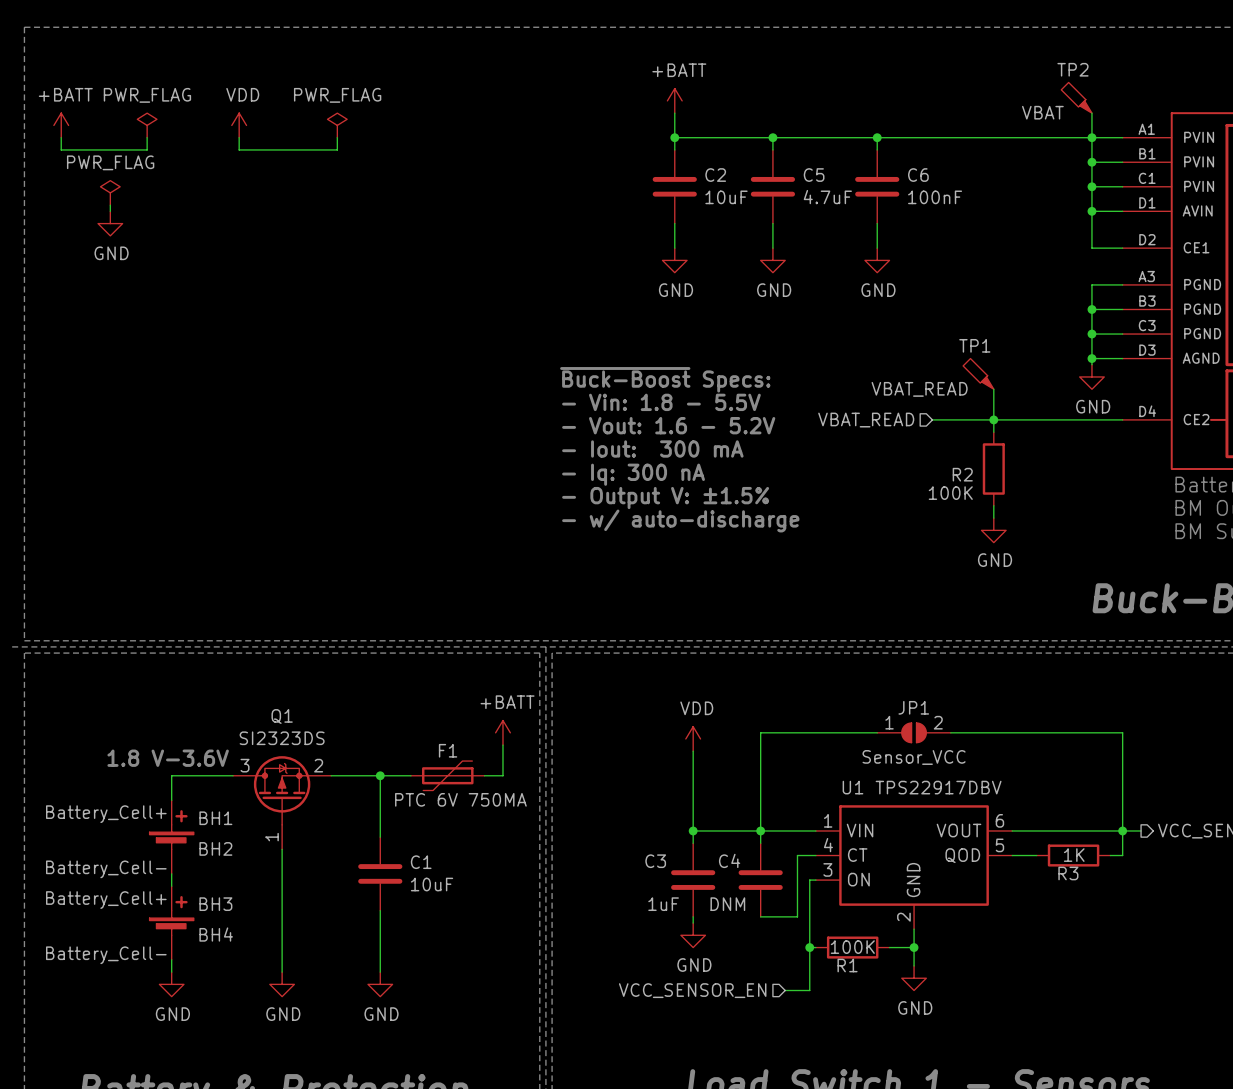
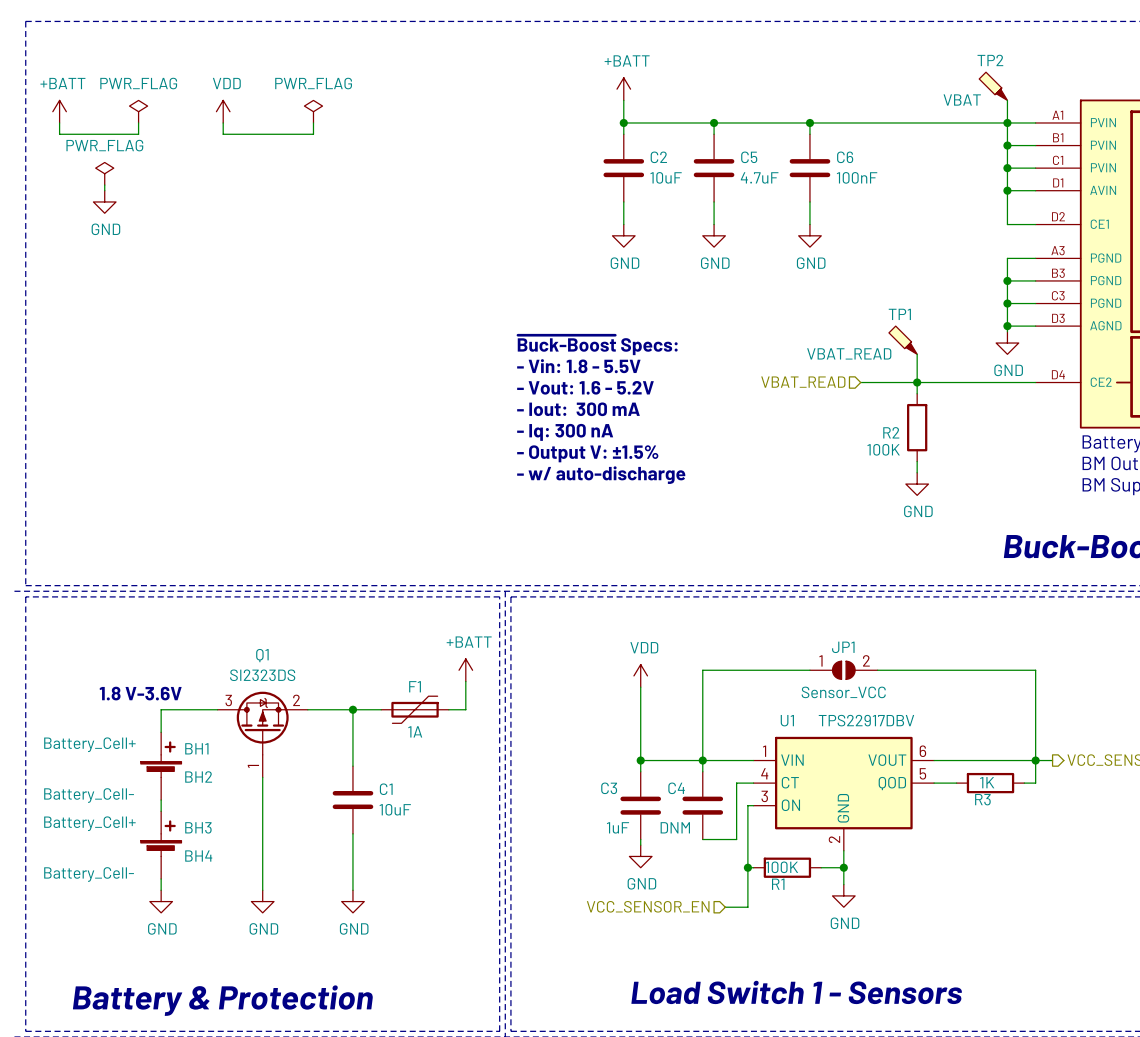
F1 value: PTC 6V 750MA (460, 799) -> 1A (415, 731)

